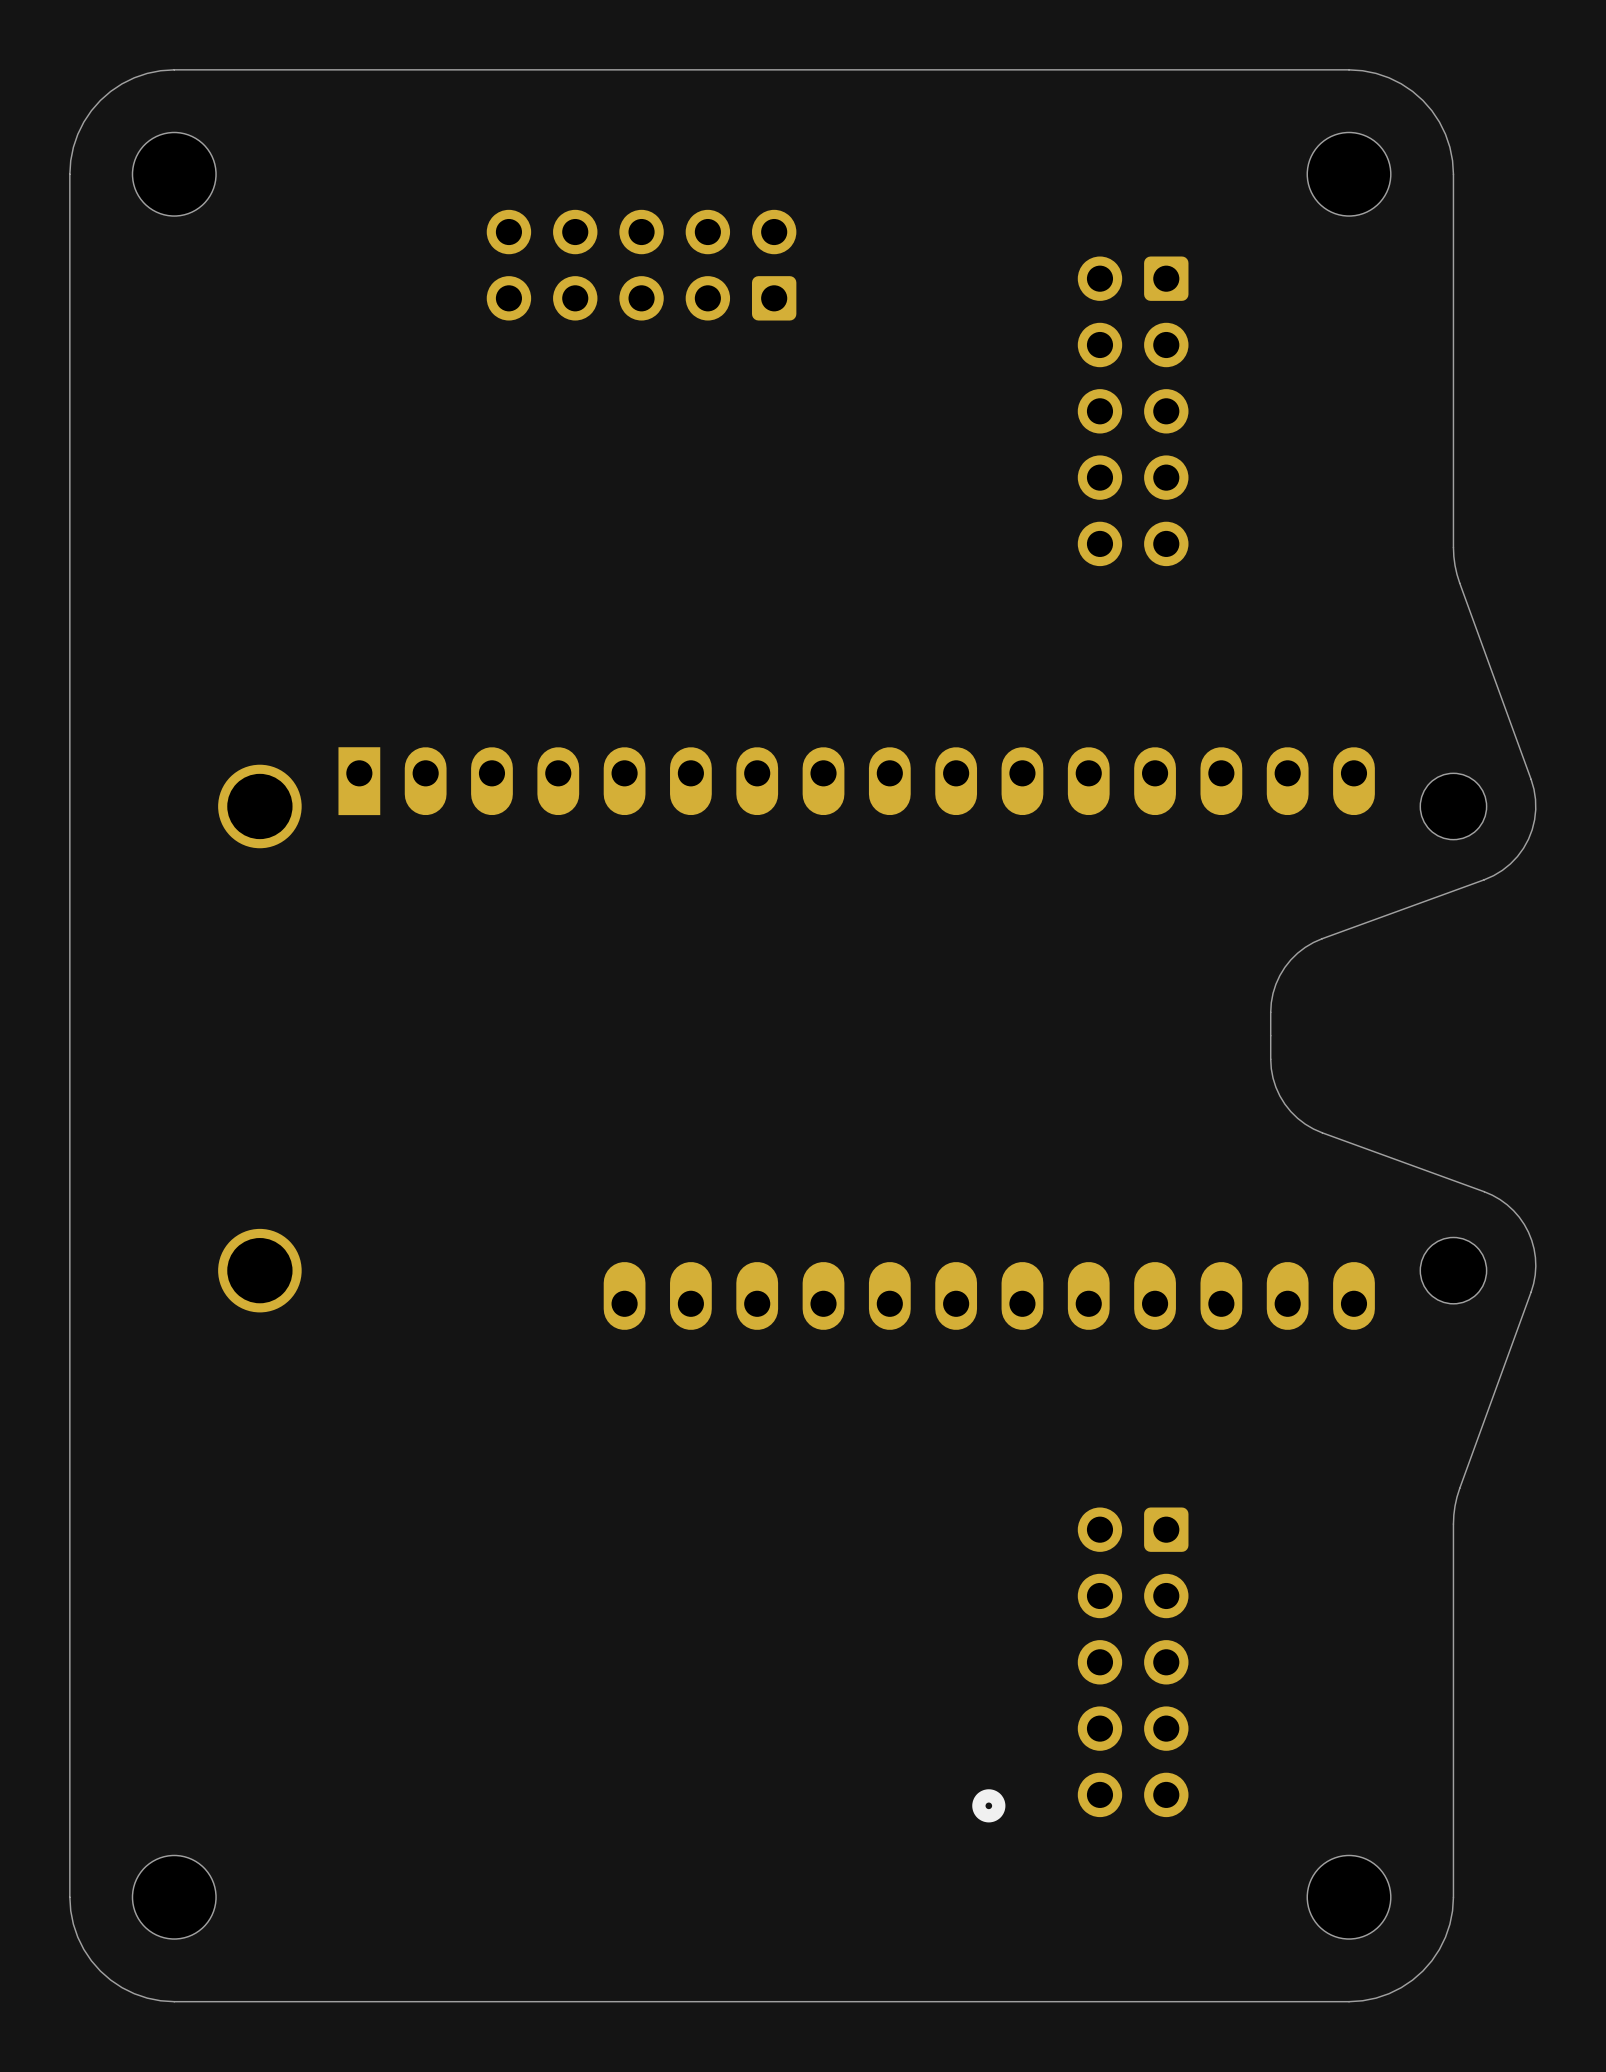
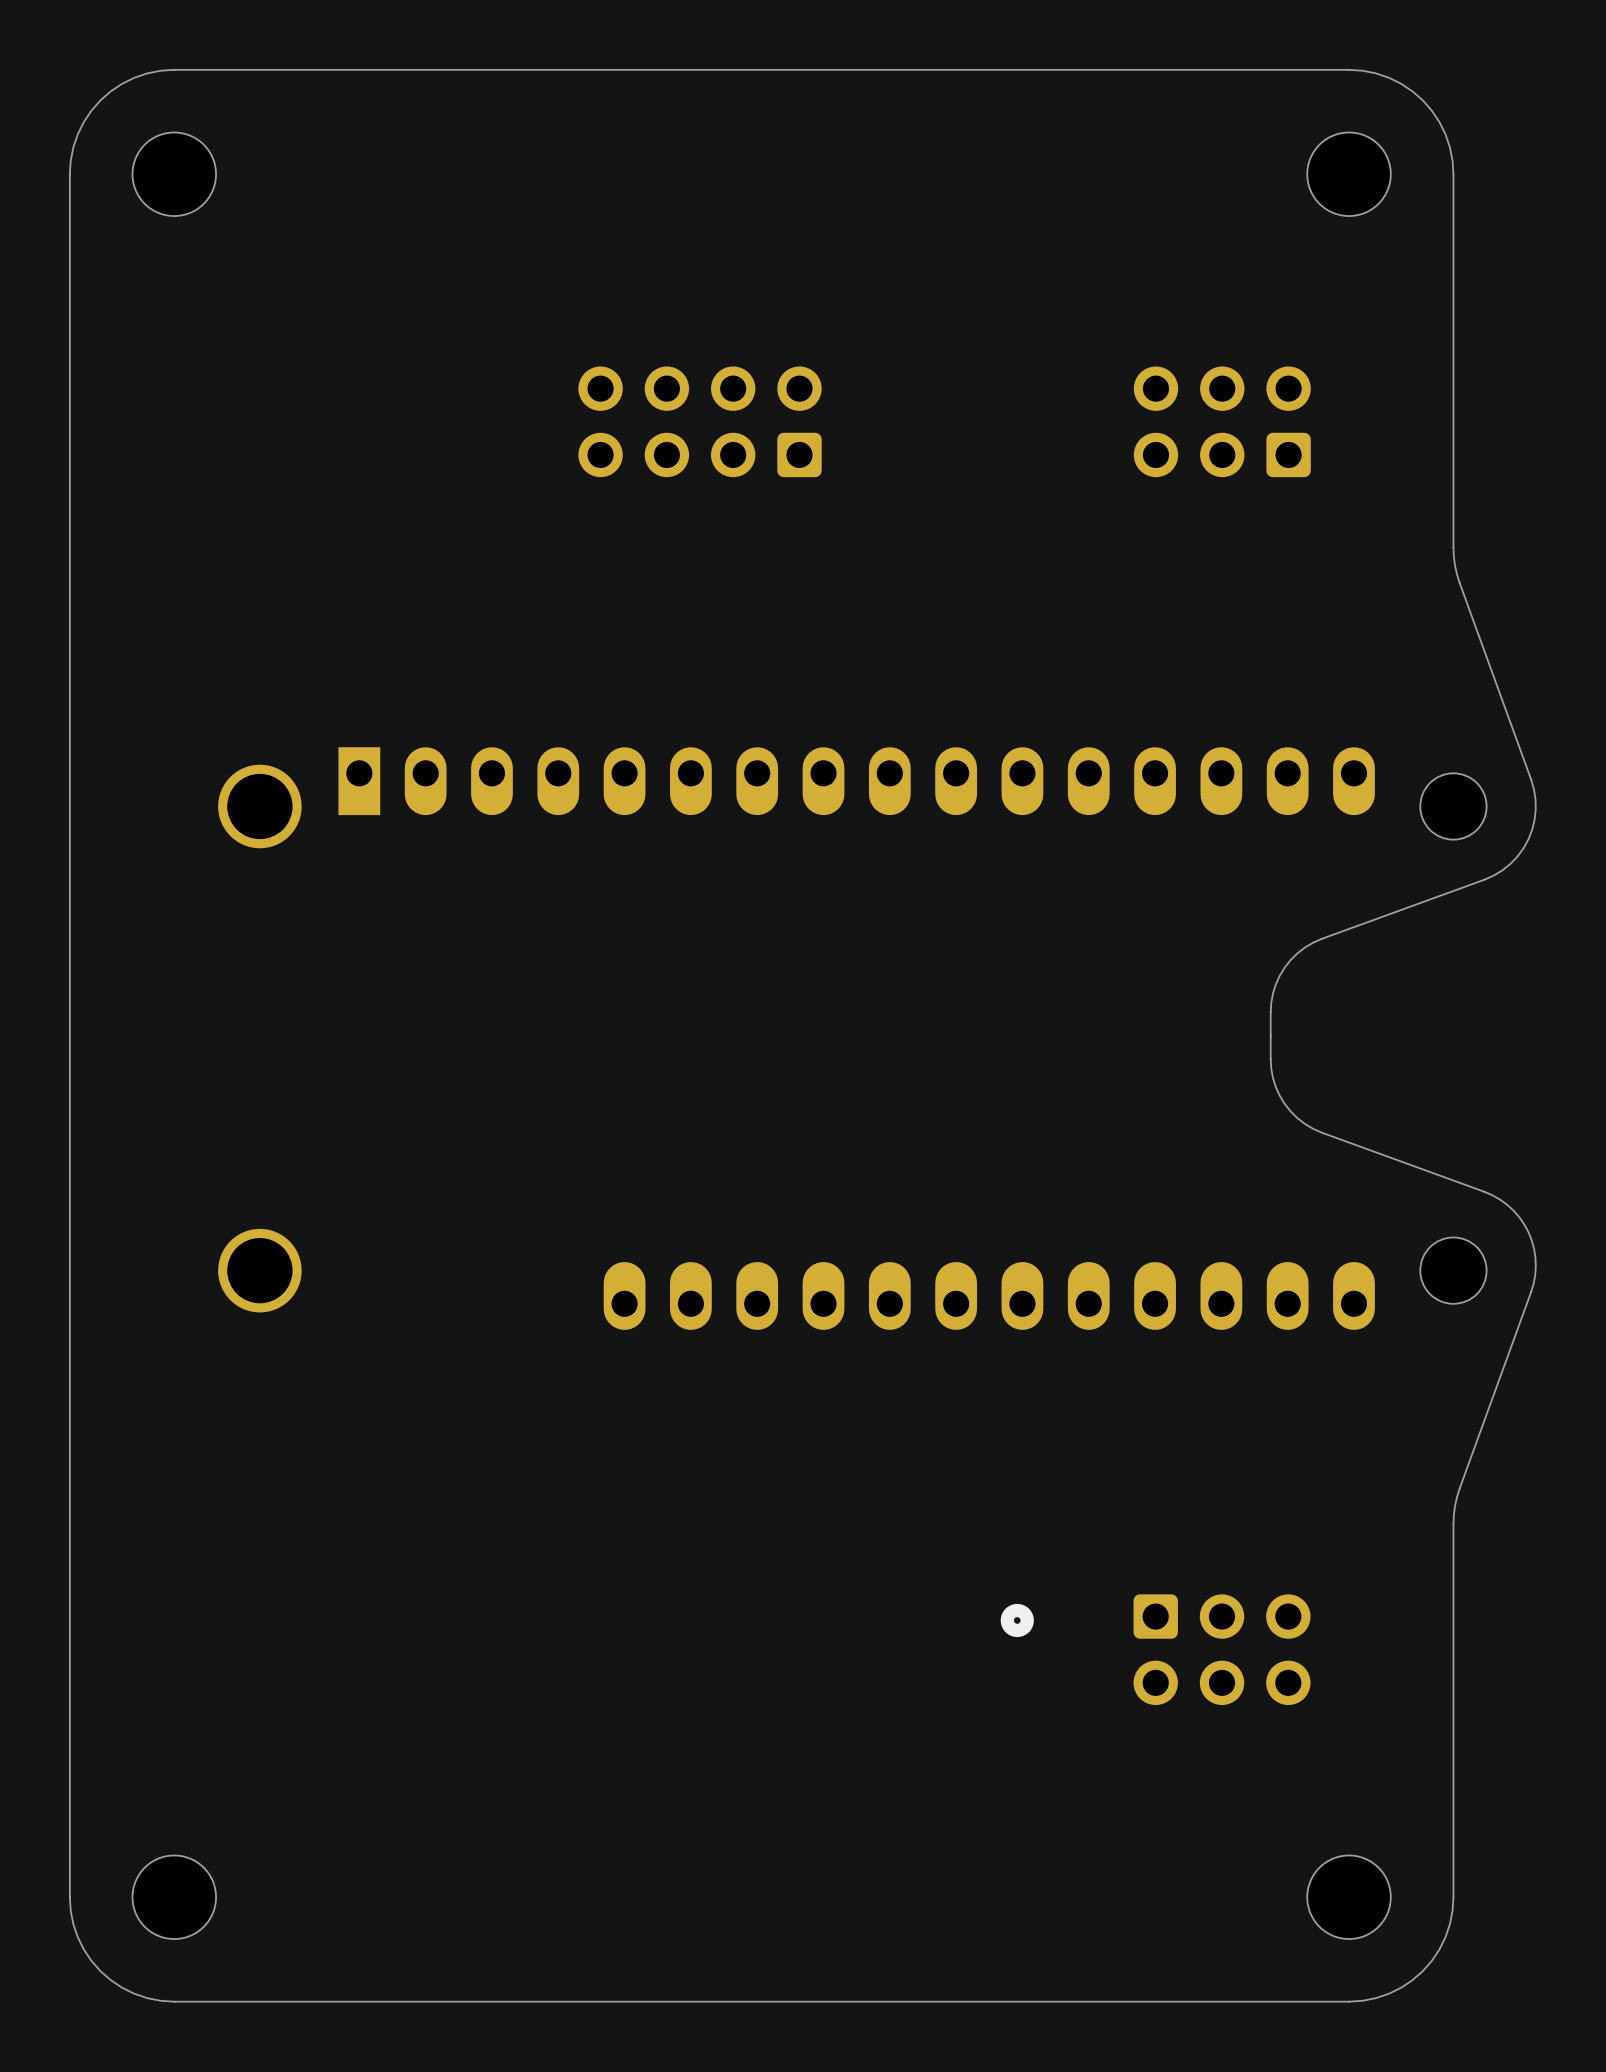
part: (641, 265) -> none
part: (1133, 411) -> none
part: none -> (700, 421)
part: none -> (1222, 421)
part: none -> (1222, 1649)
part: (1133, 1662) -> none
part position: (988, 1805) -> (1017, 1620)

